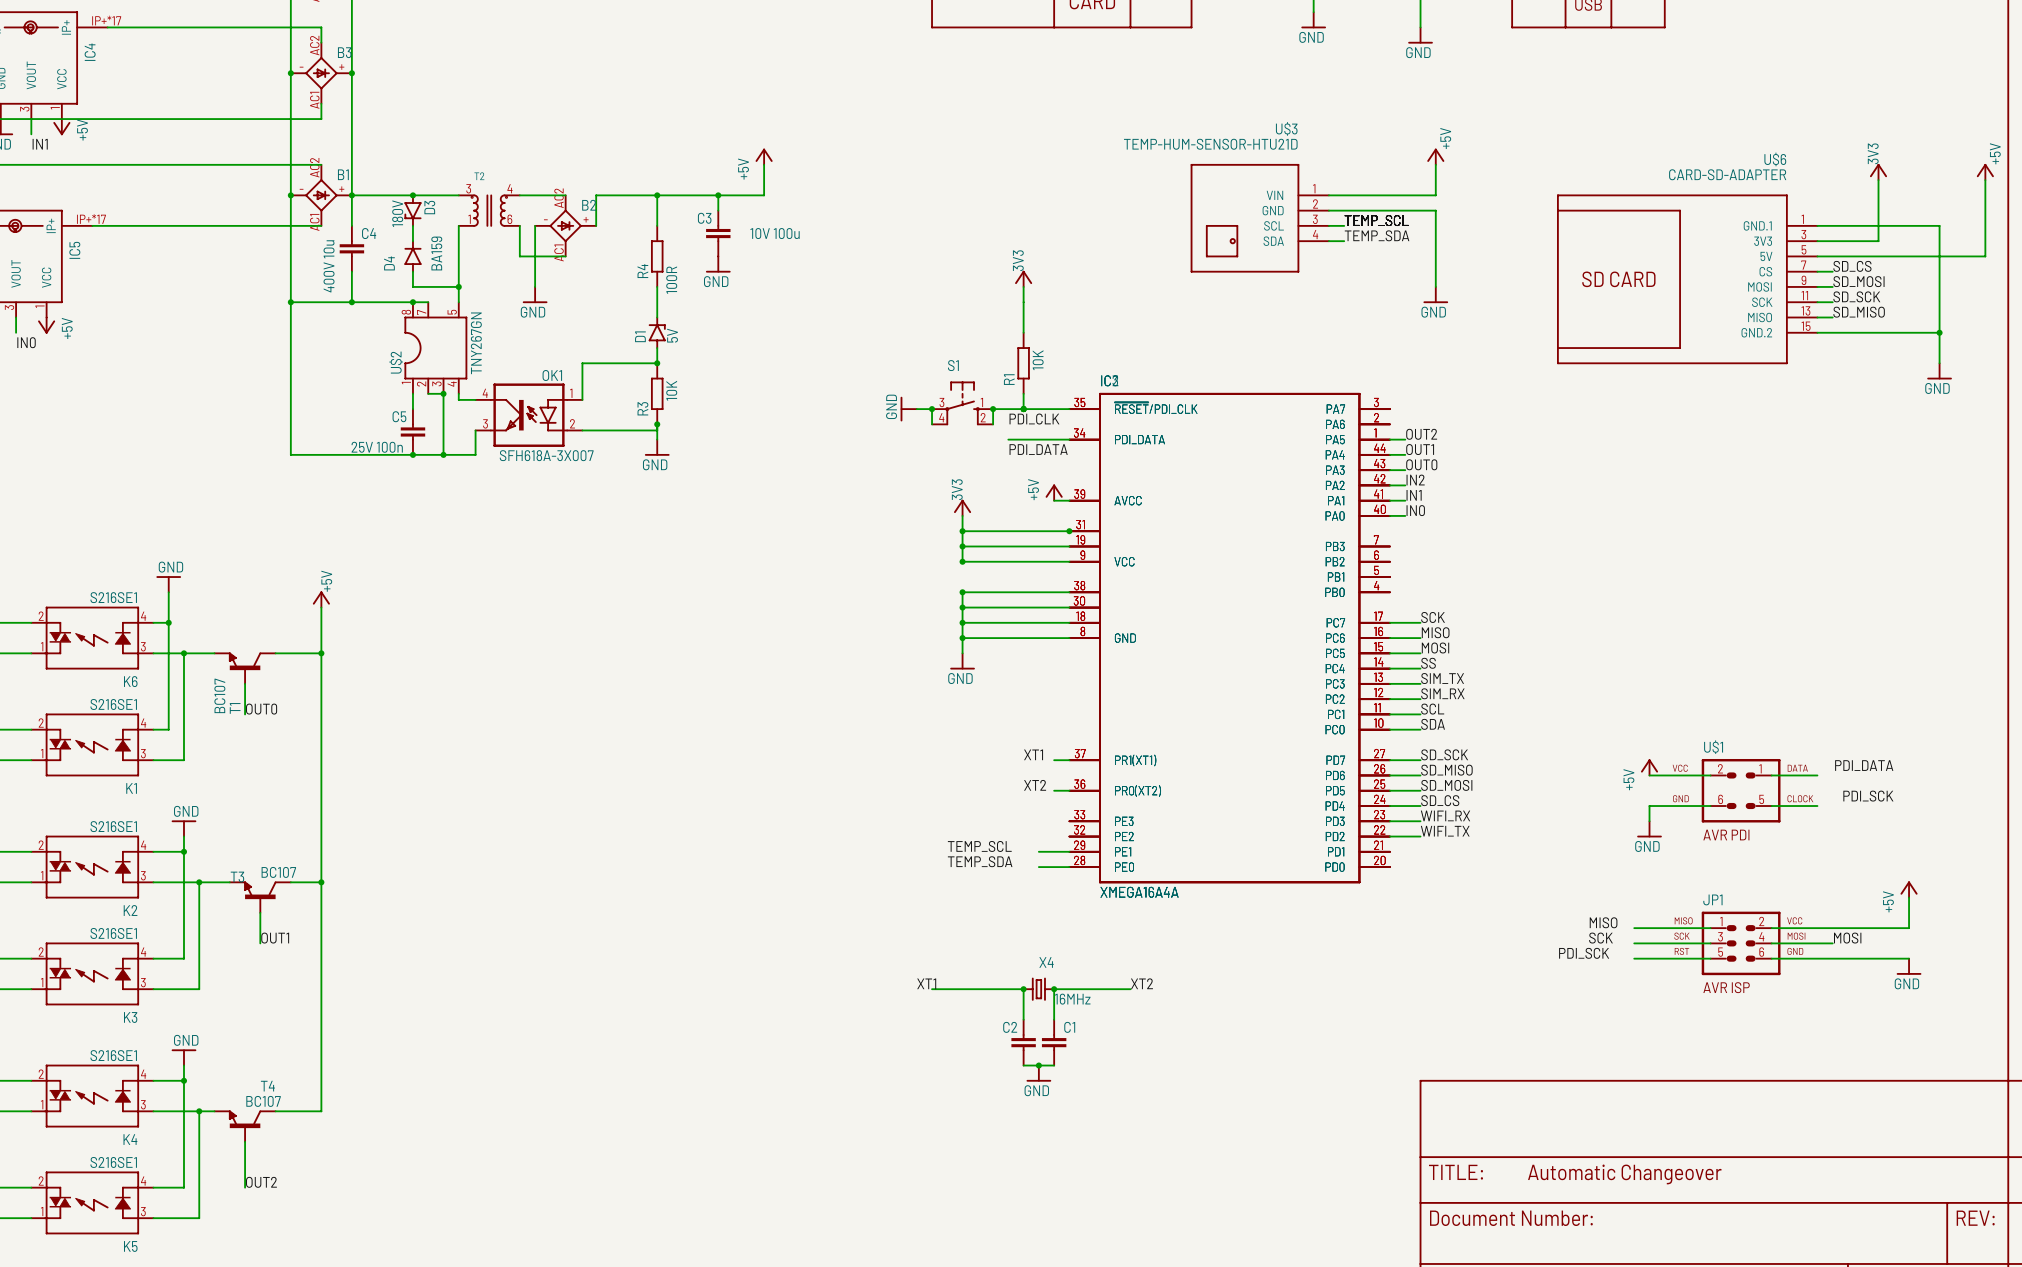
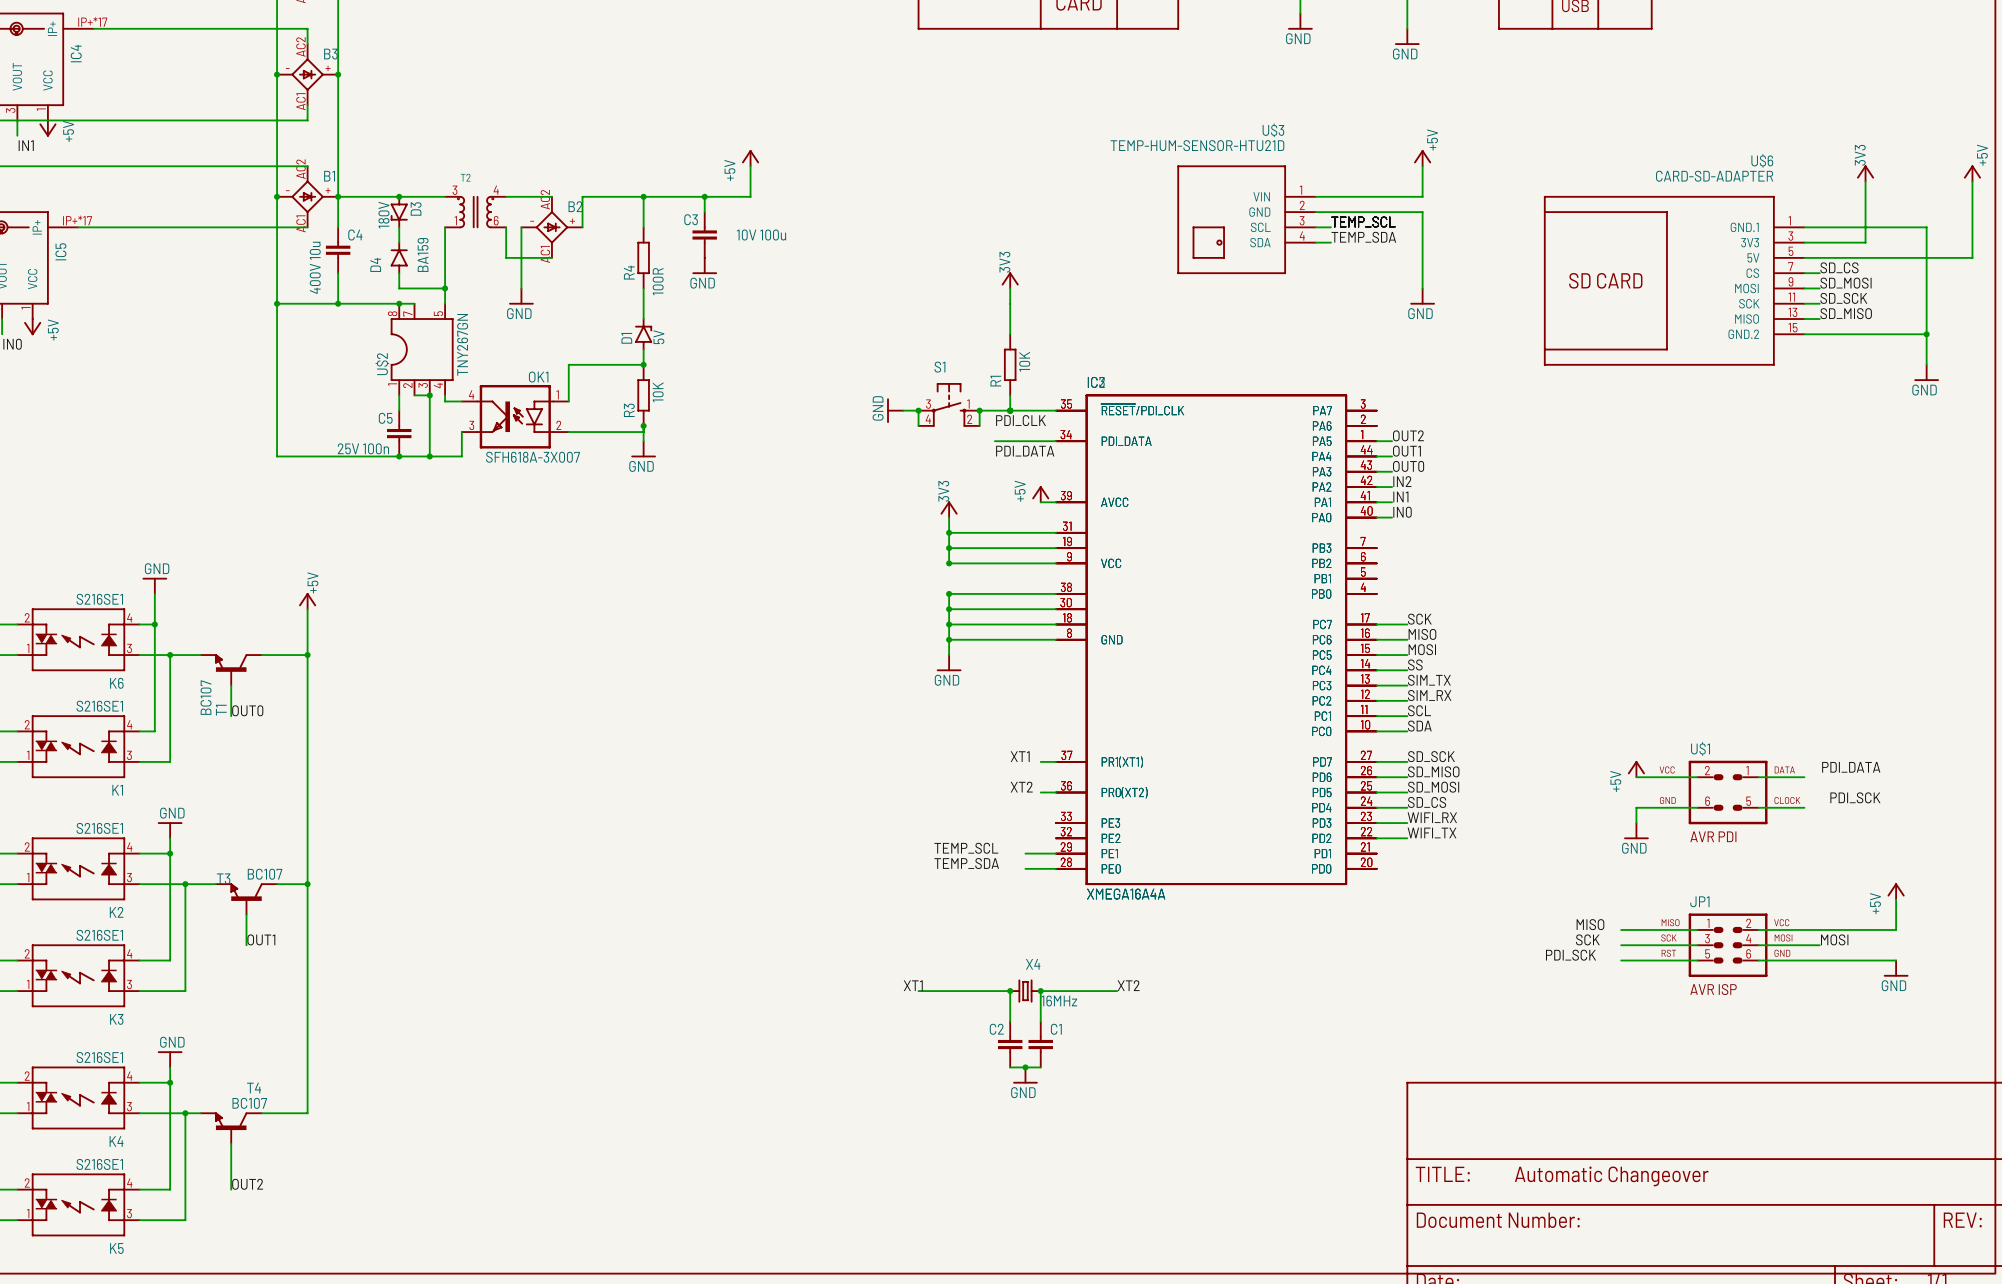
junction: (1069, 531) -> none

